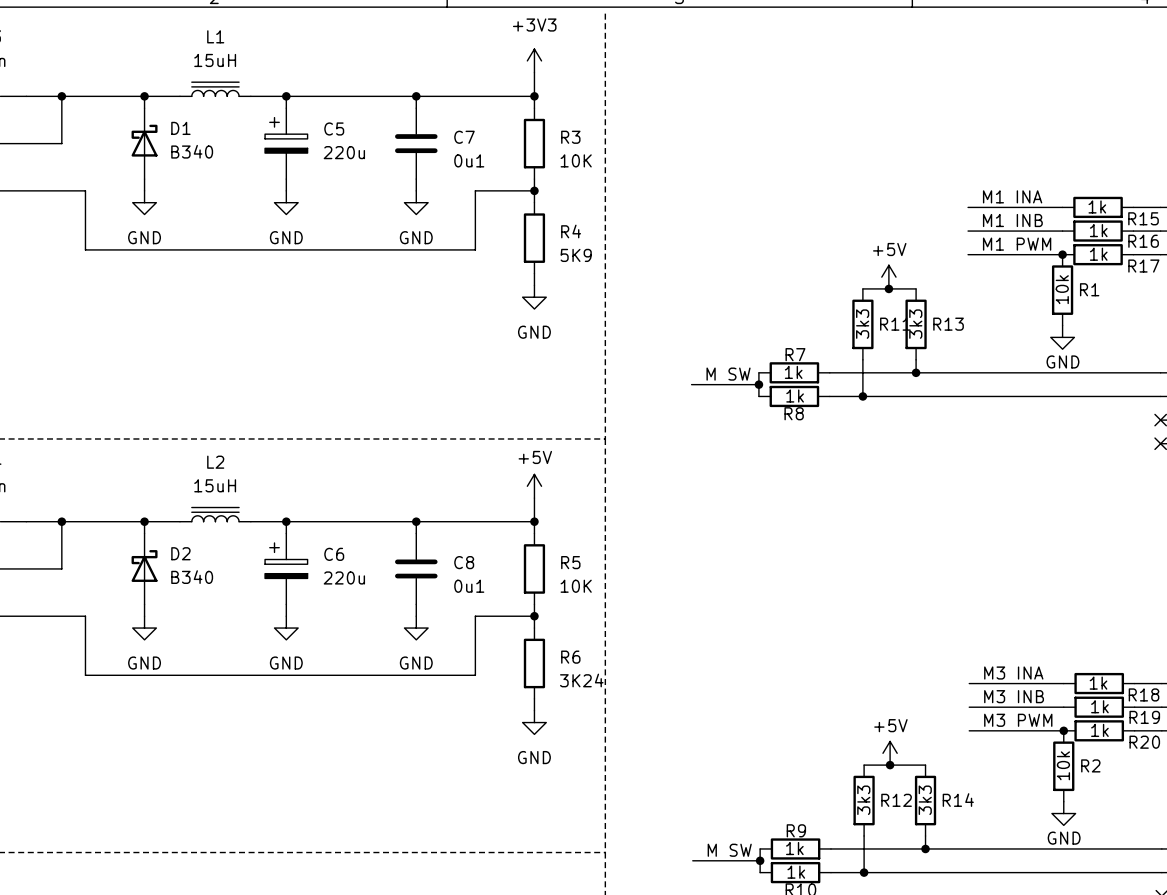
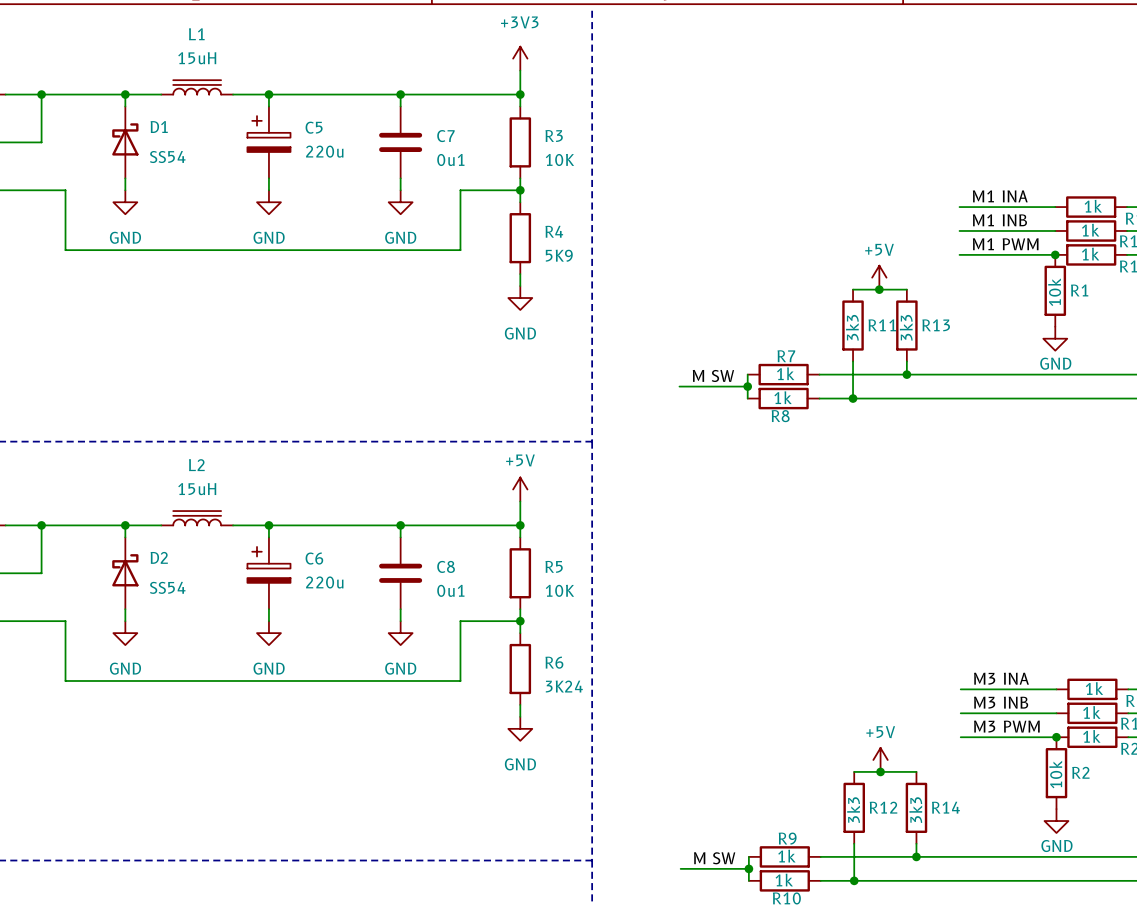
D1 value: B340 (192, 151) -> SS54 (167, 157)
D2 value: B340 (192, 577) -> SS54 (167, 587)

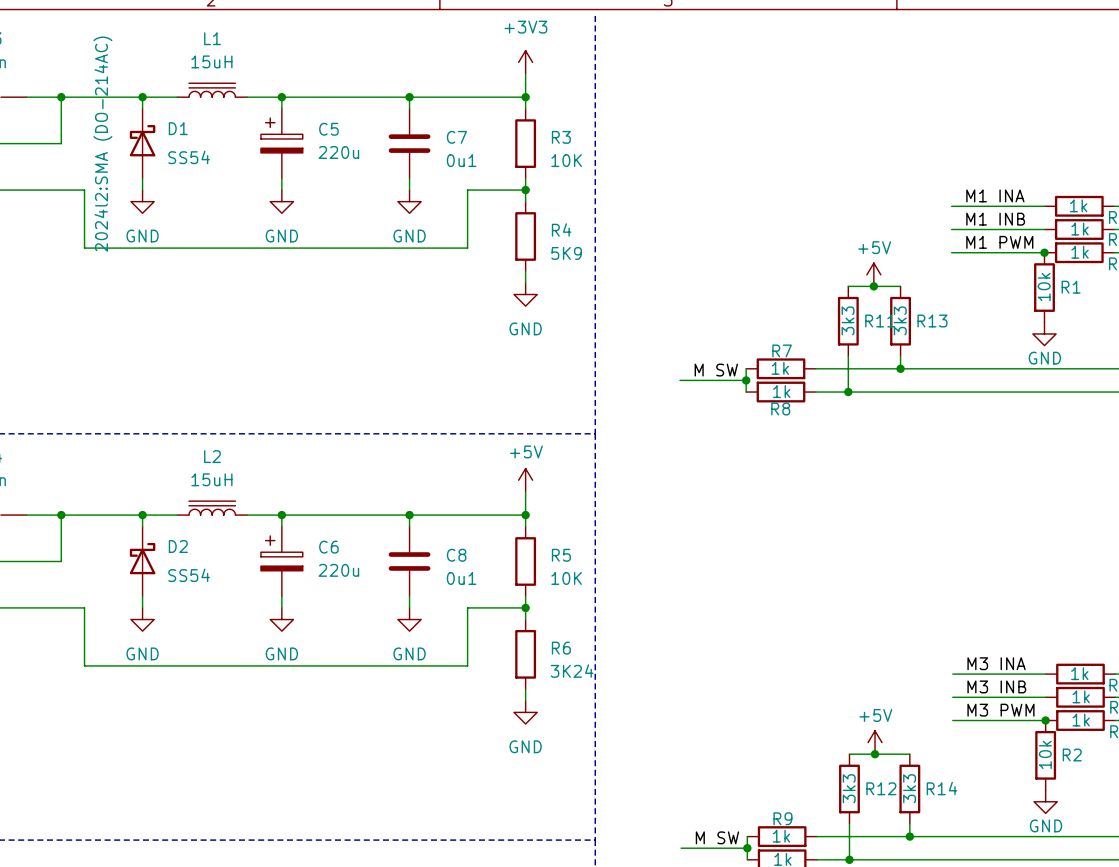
D1 text: none -> 2024l2:SMA (DO-214AC) (102, 144)

